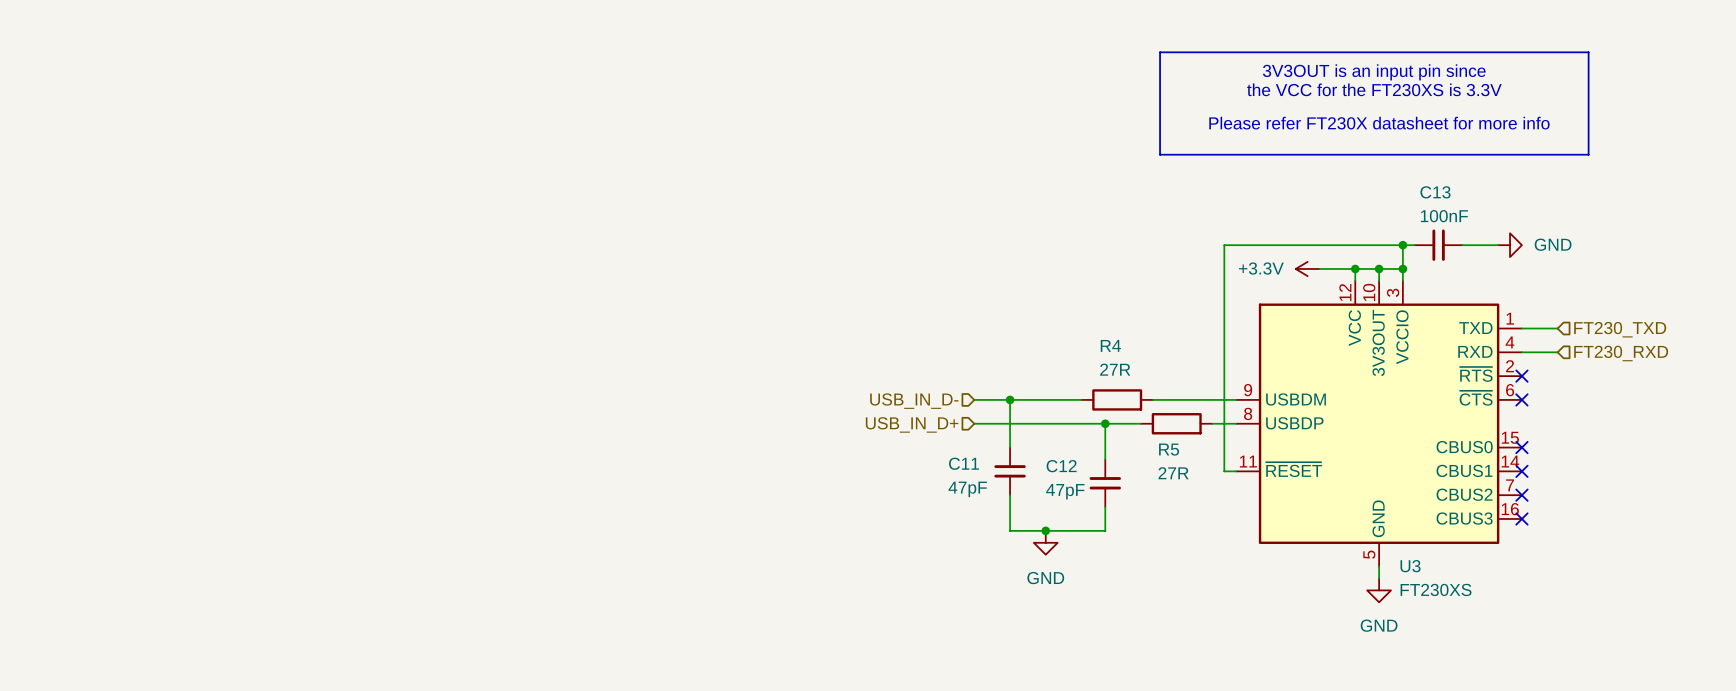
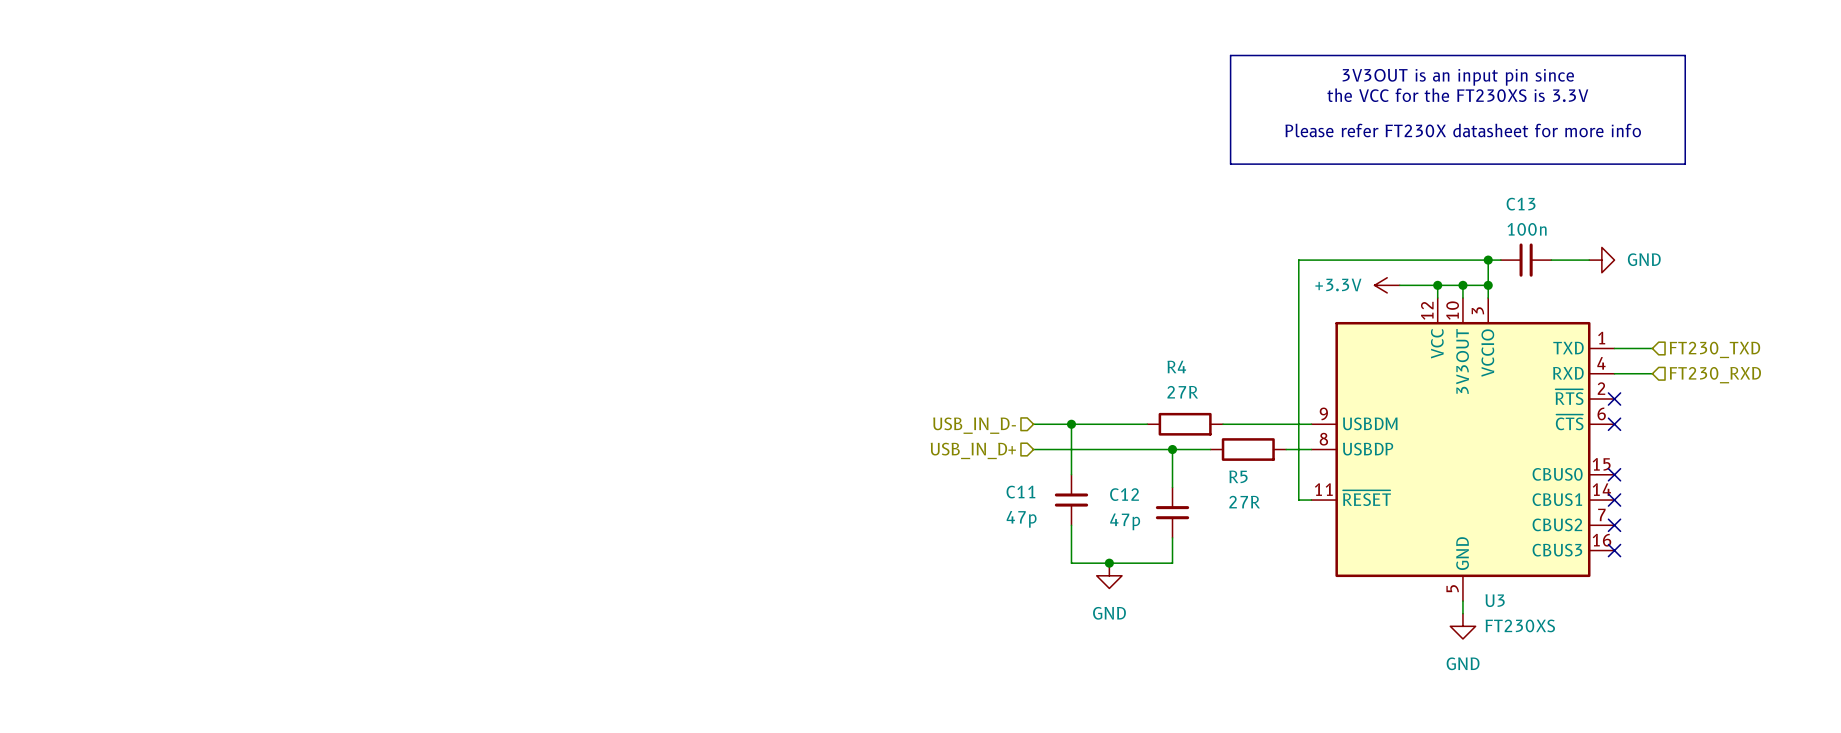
C13 value: 100nF (1444, 216) -> 100n (1527, 229)
C11 value: 47pF (967, 489) -> 47p (1021, 519)
C12 value: 47pF (1065, 491) -> 47p (1125, 521)

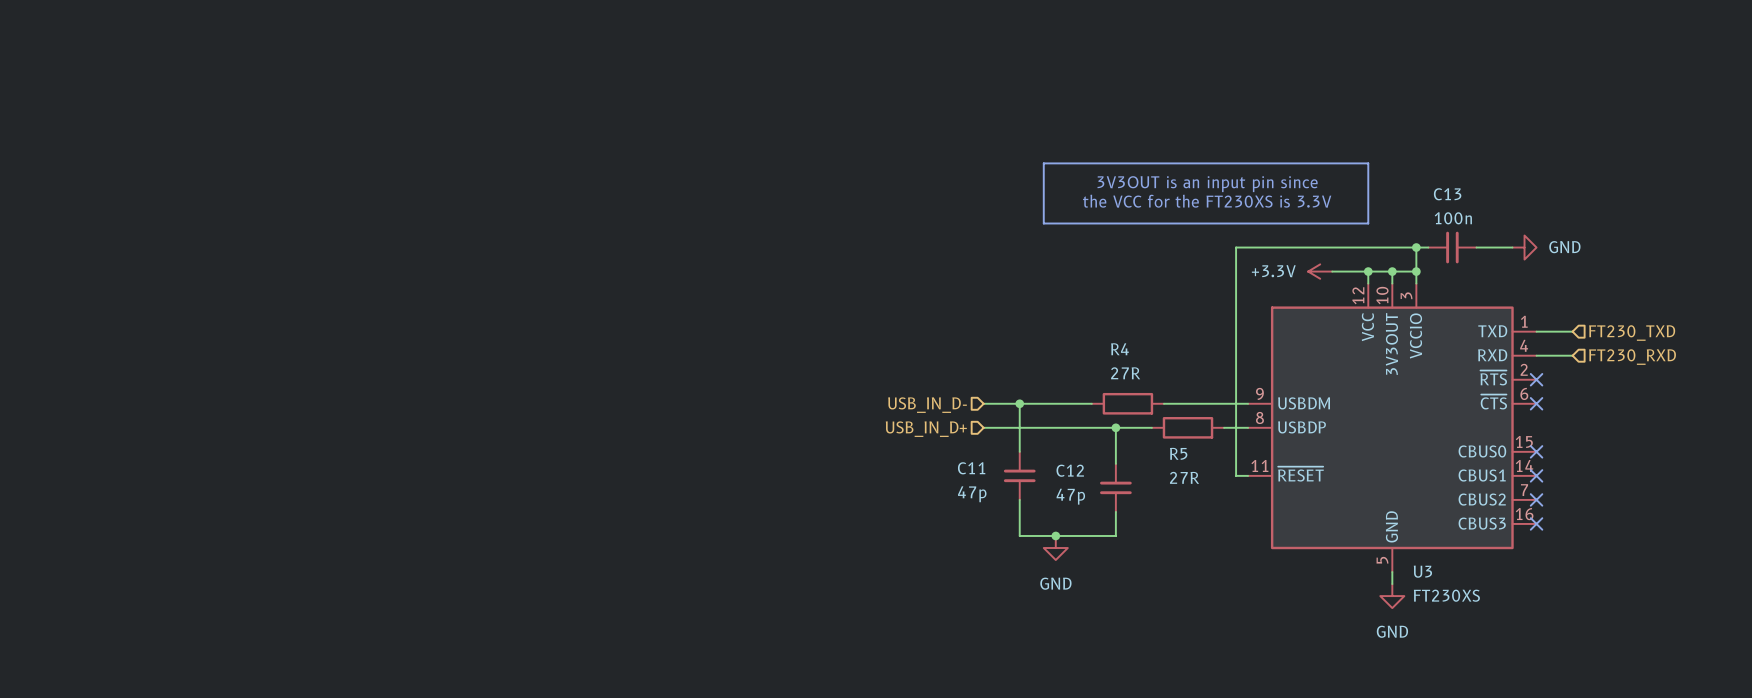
line: (1230, 55) (1685, 55) (1685, 164) (1230, 164) (1230, 55) -> none
text position: 3V3OUT is an input pin since (1458, 77) -> 3V3OUT is an input pin since (1207, 184)
text position: the VCC for the FT230XS is 3.3V (1457, 95) -> the VCC for the FT230XS is 3.3V (1207, 201)
text: Please refer FT230X datasheet for more info (1463, 130) -> none
line: none -> (1043, 163) (1368, 163) (1368, 223) (1043, 223) (1043, 163)

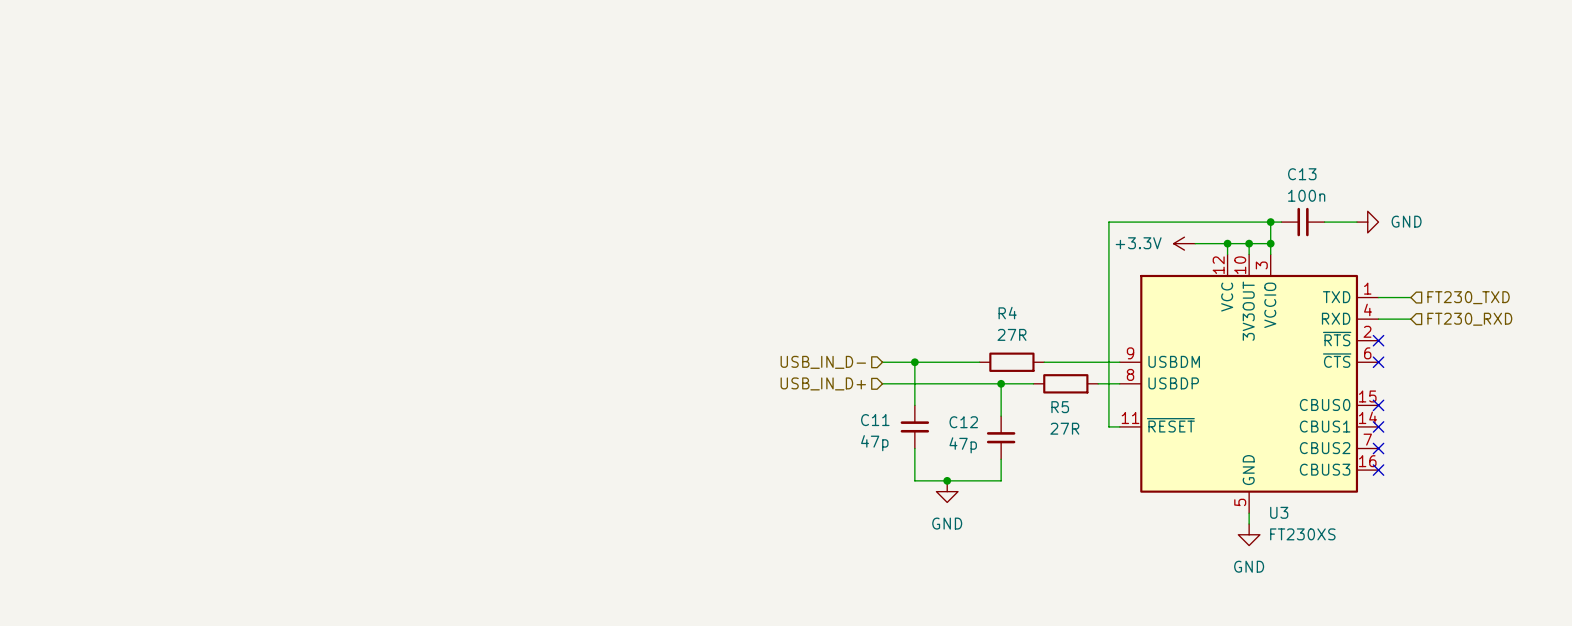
line: (1043, 163) (1368, 163) (1368, 223) (1043, 223) (1043, 163) -> none
text: 3V3OUT is an input pin since (1207, 184) -> none
text: the VCC for the FT230XS is 3.3V (1207, 201) -> none

